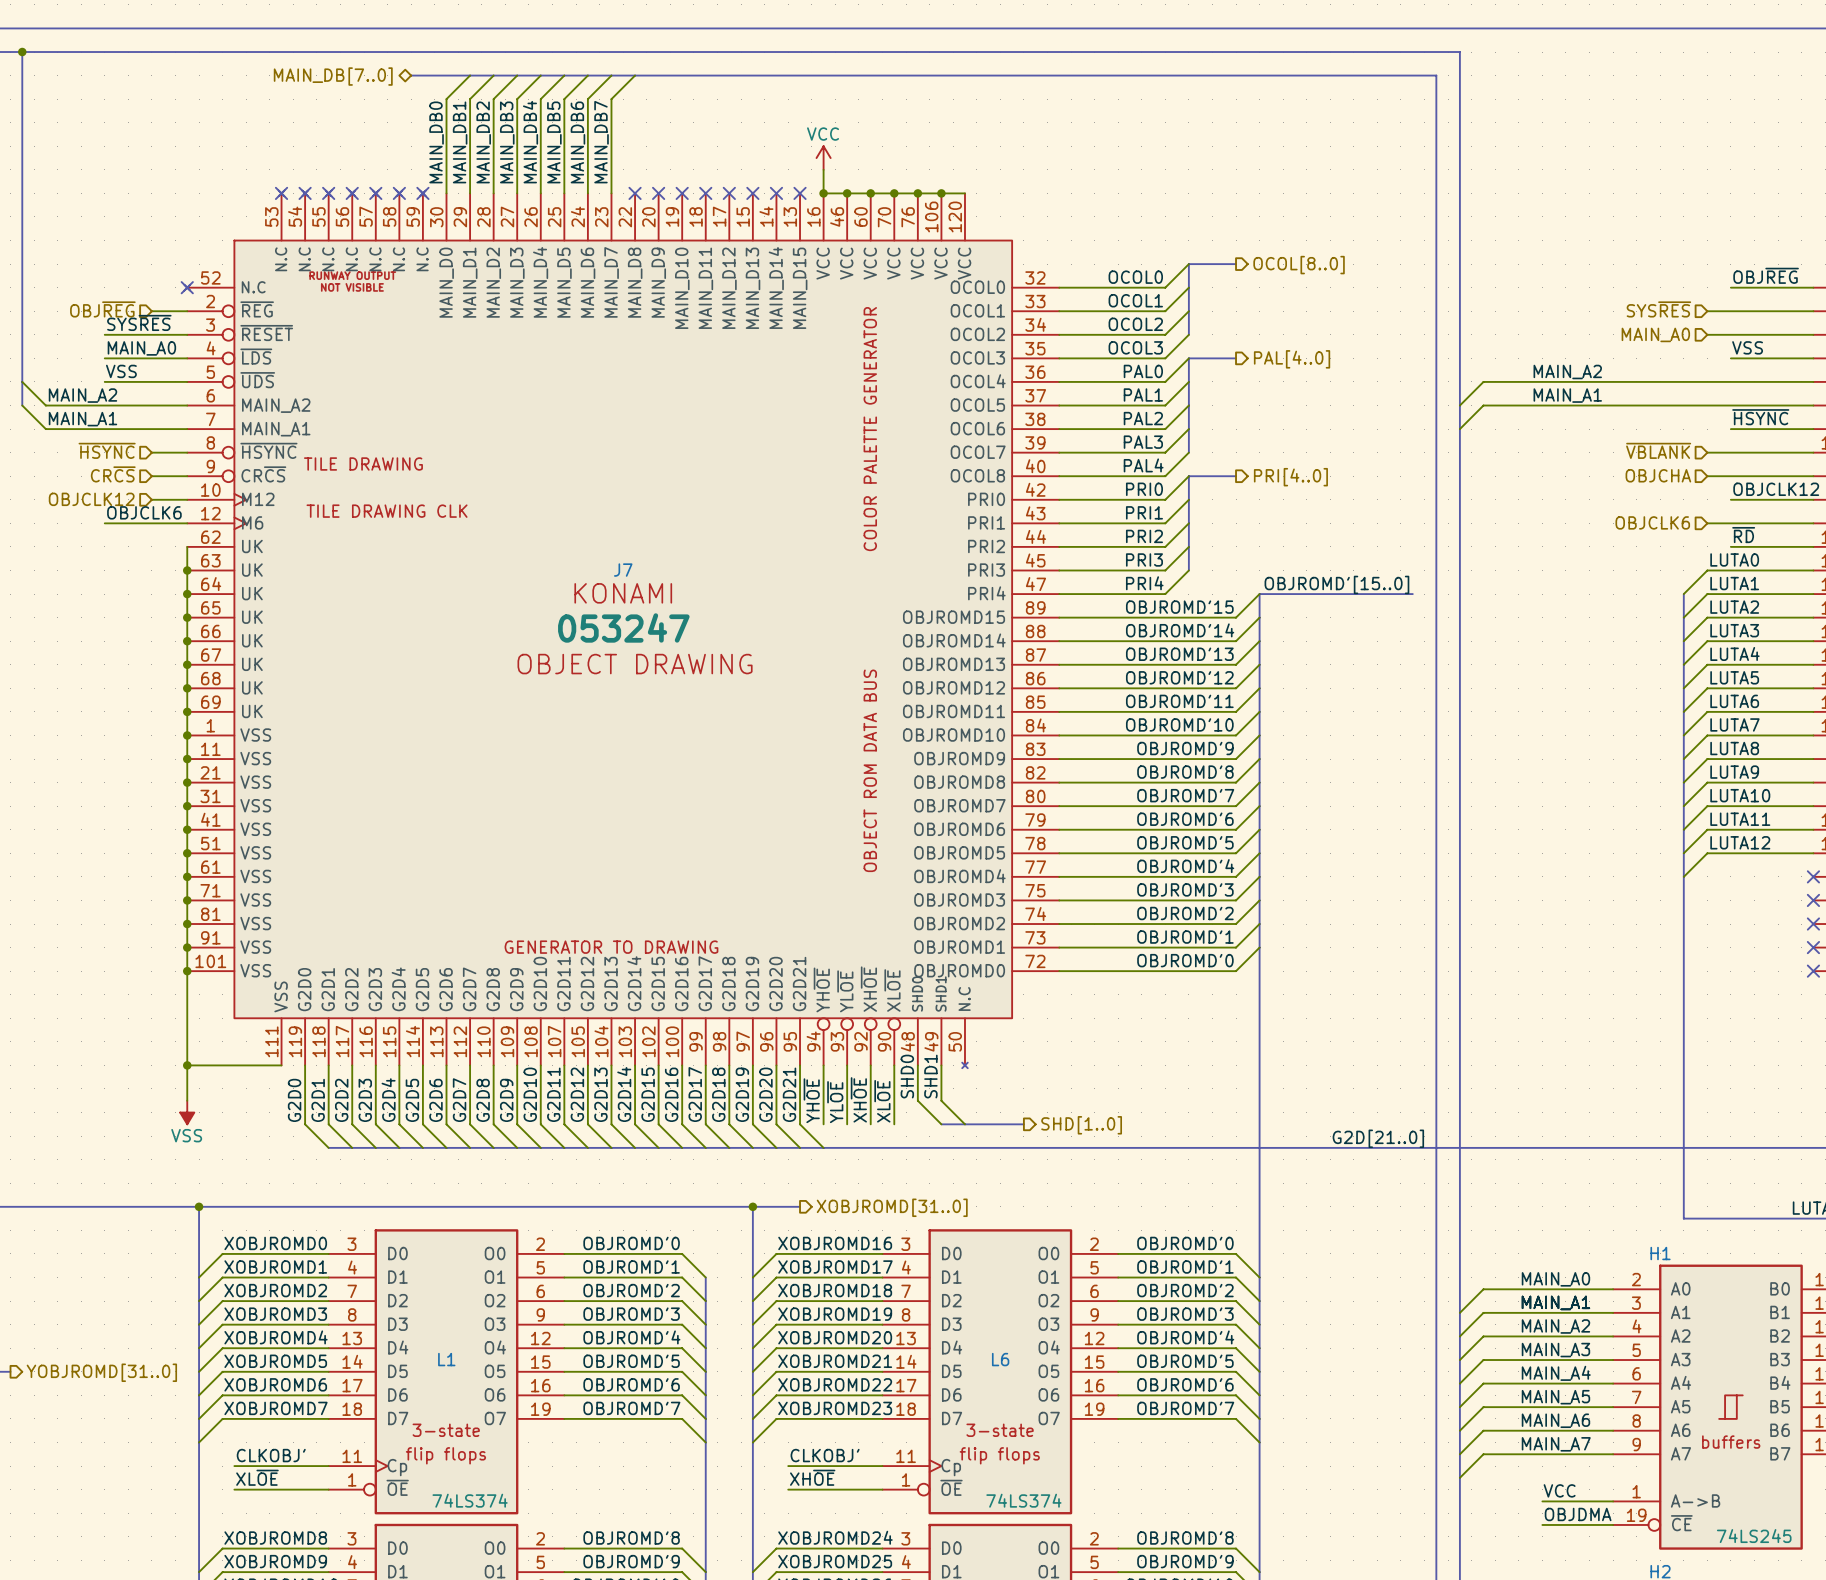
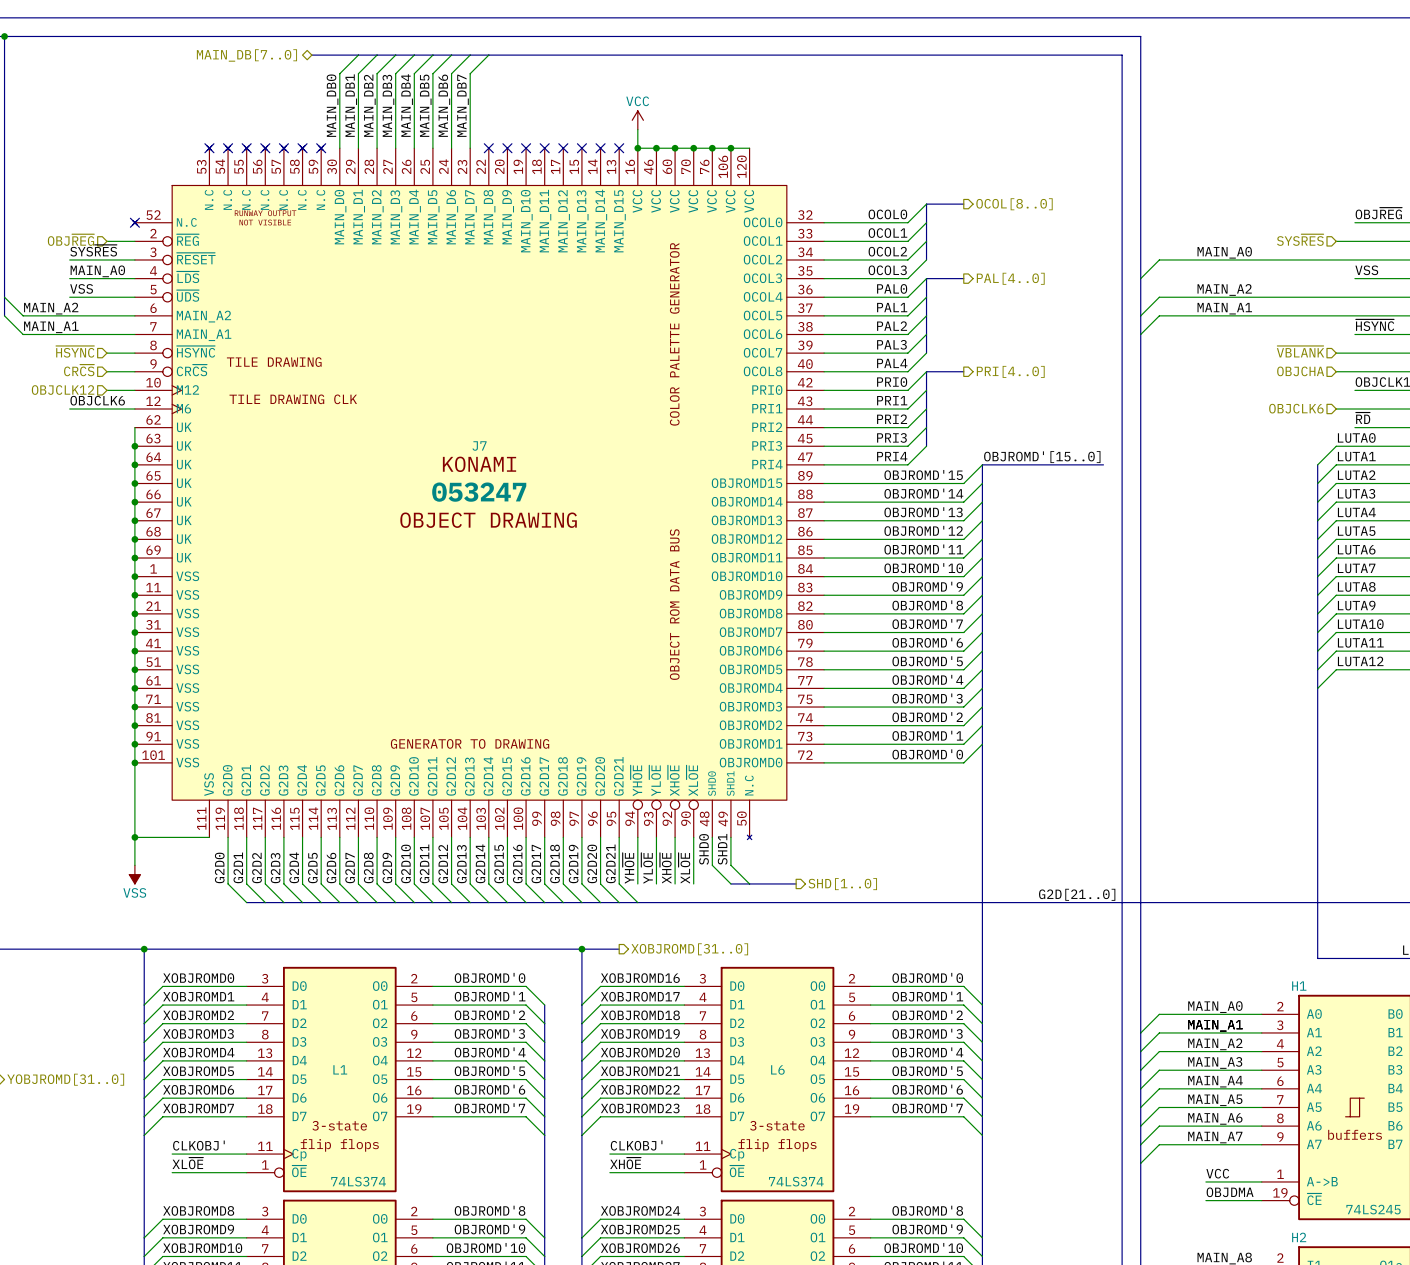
label: none -> MAIN_A0 (1224, 252)
hierarchical label: MAIN_A0 (1655, 334) -> none
wire: none -> (1336, 259) (1159, 259) (1140, 278)

